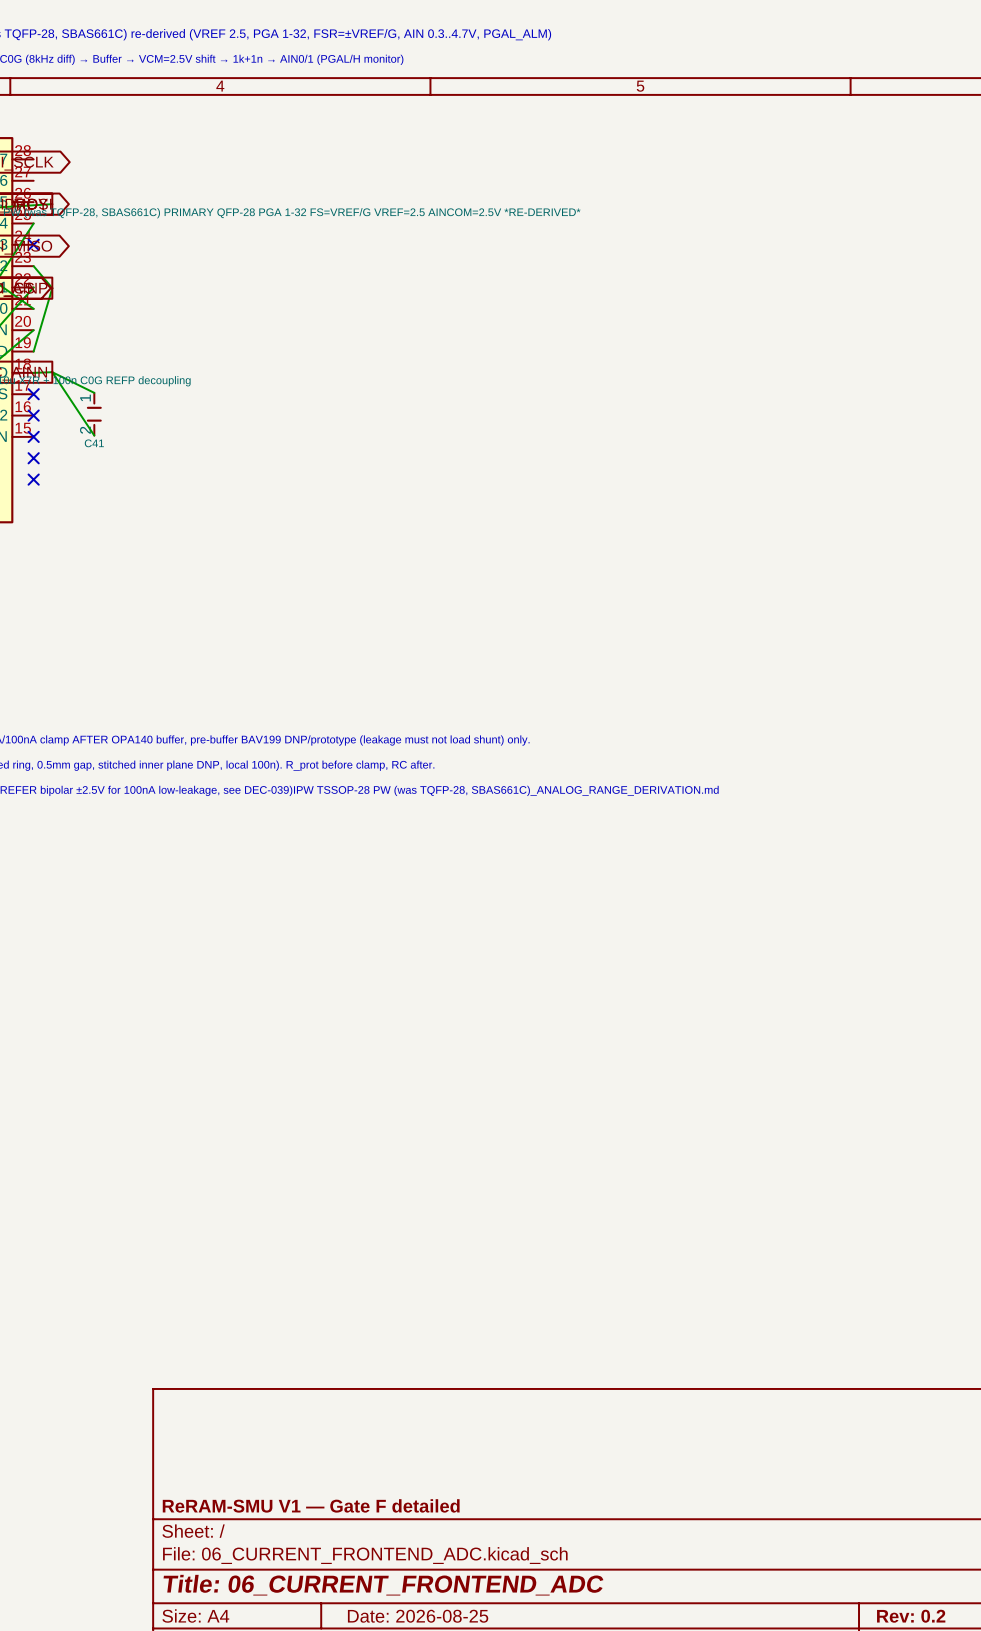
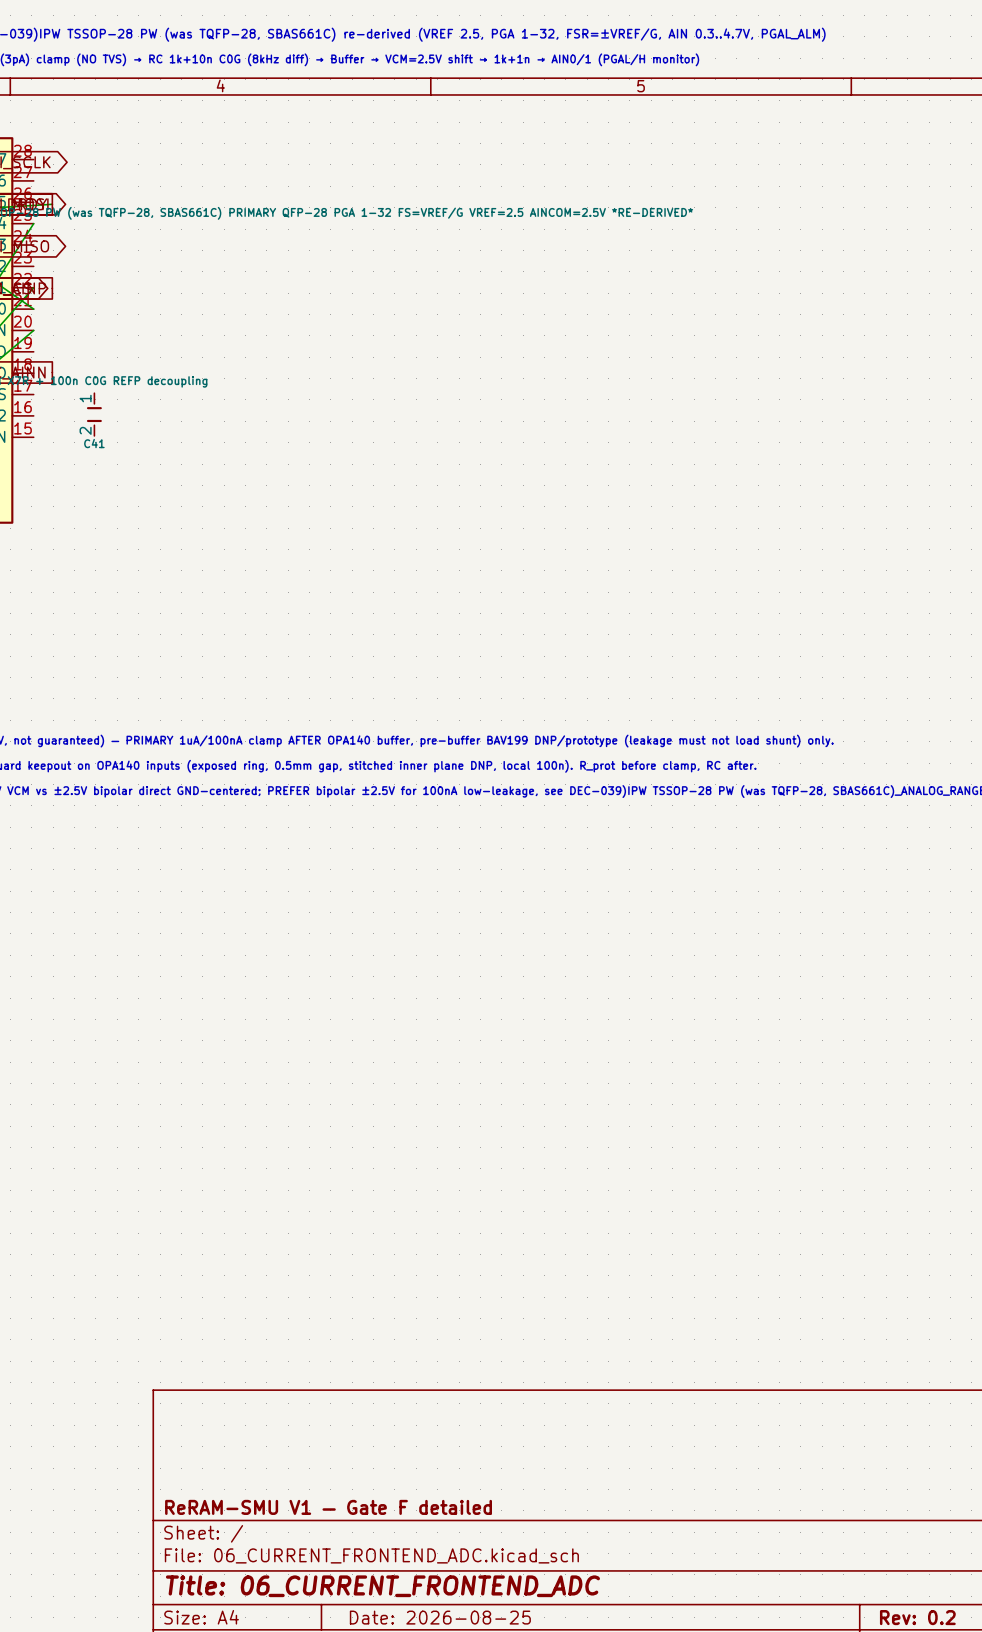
no-connect mark: (33, 244) -> none
wire: (33, 266) (52, 288) (33, 351) -> none
wire: (52, 372) (33, 372) -> none
wire: (52, 372) (94, 435) -> none
wire: (52, 372) (94, 392) -> none
no-connect mark: (33, 394) -> none
no-connect mark: (33, 415) -> none
no-connect mark: (33, 436) -> none
no-connect mark: (33, 458) -> none
no-connect mark: (33, 479) -> none

